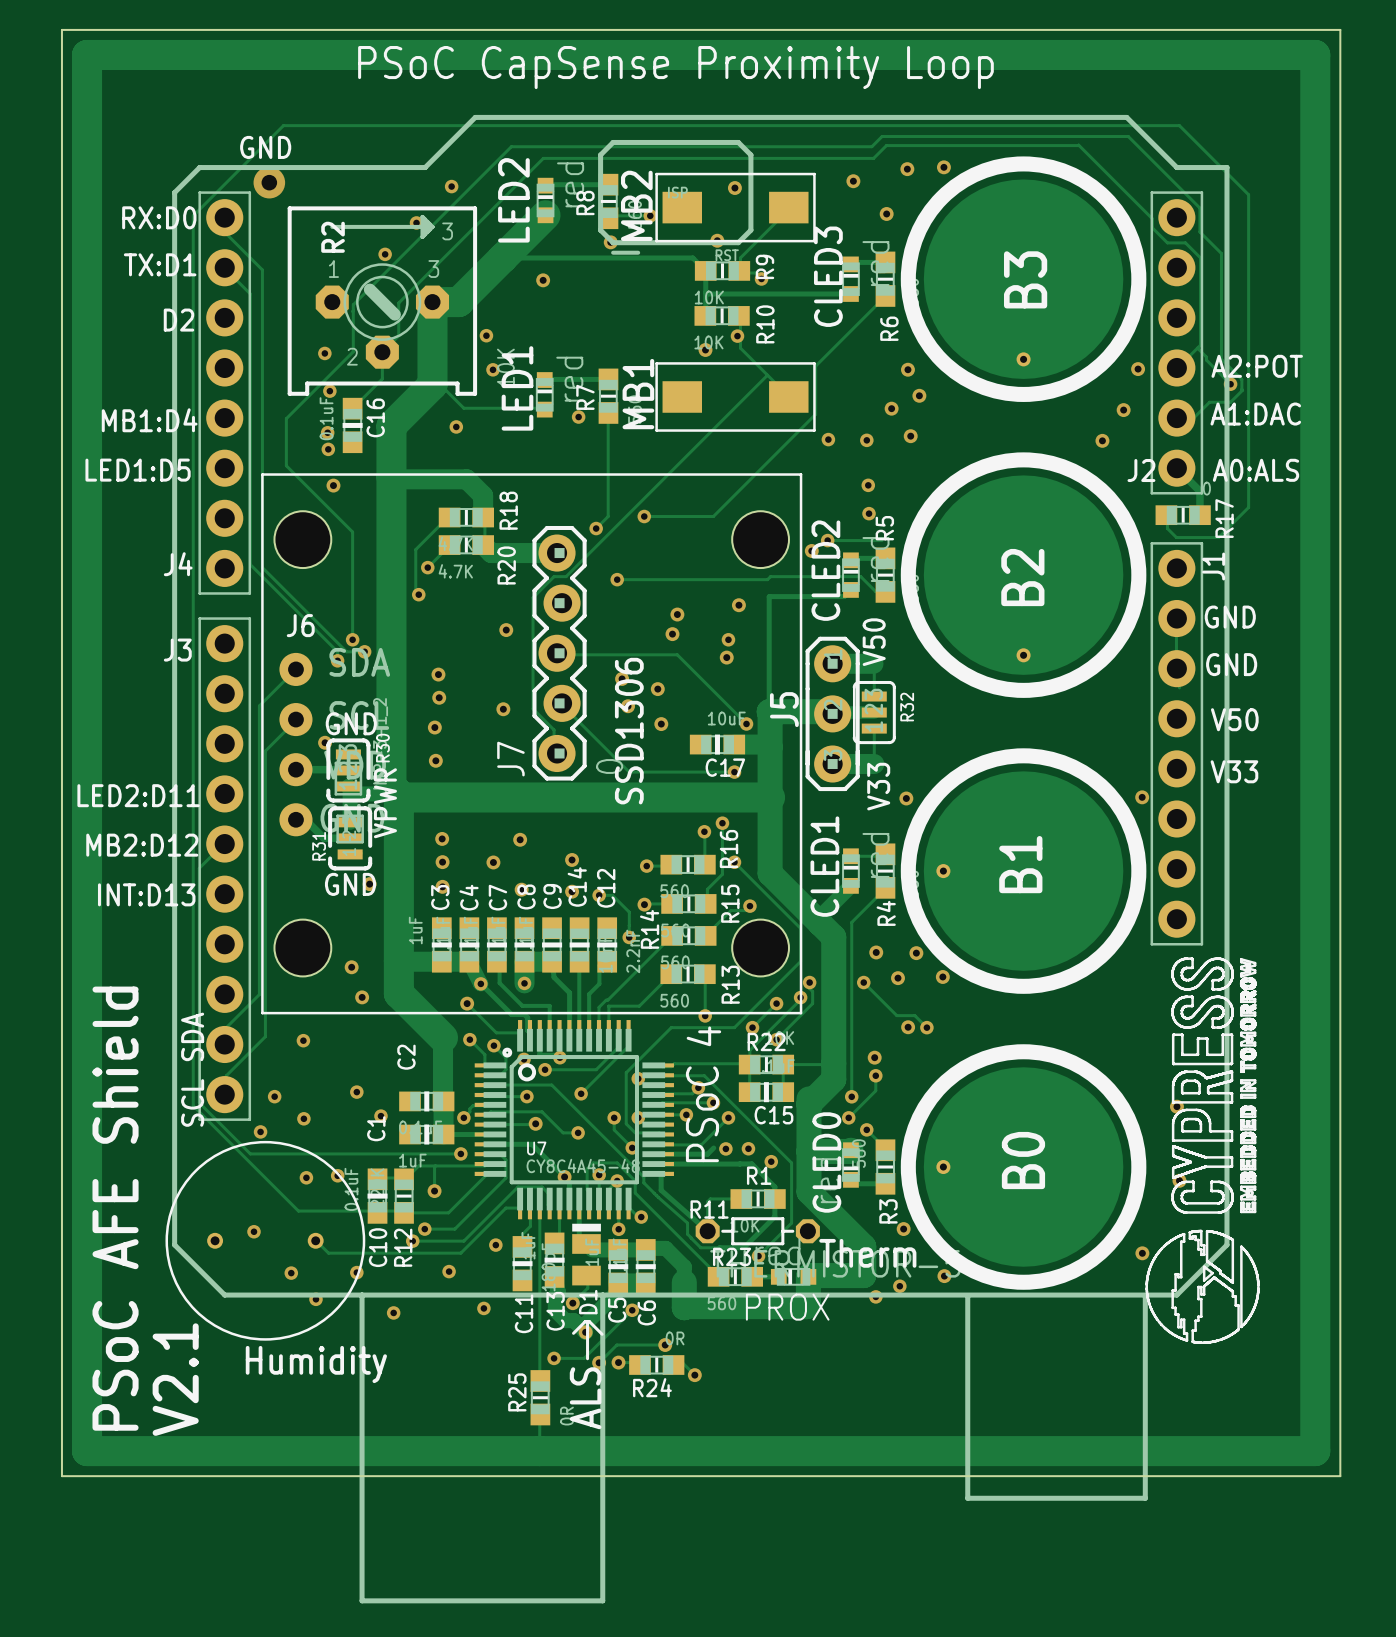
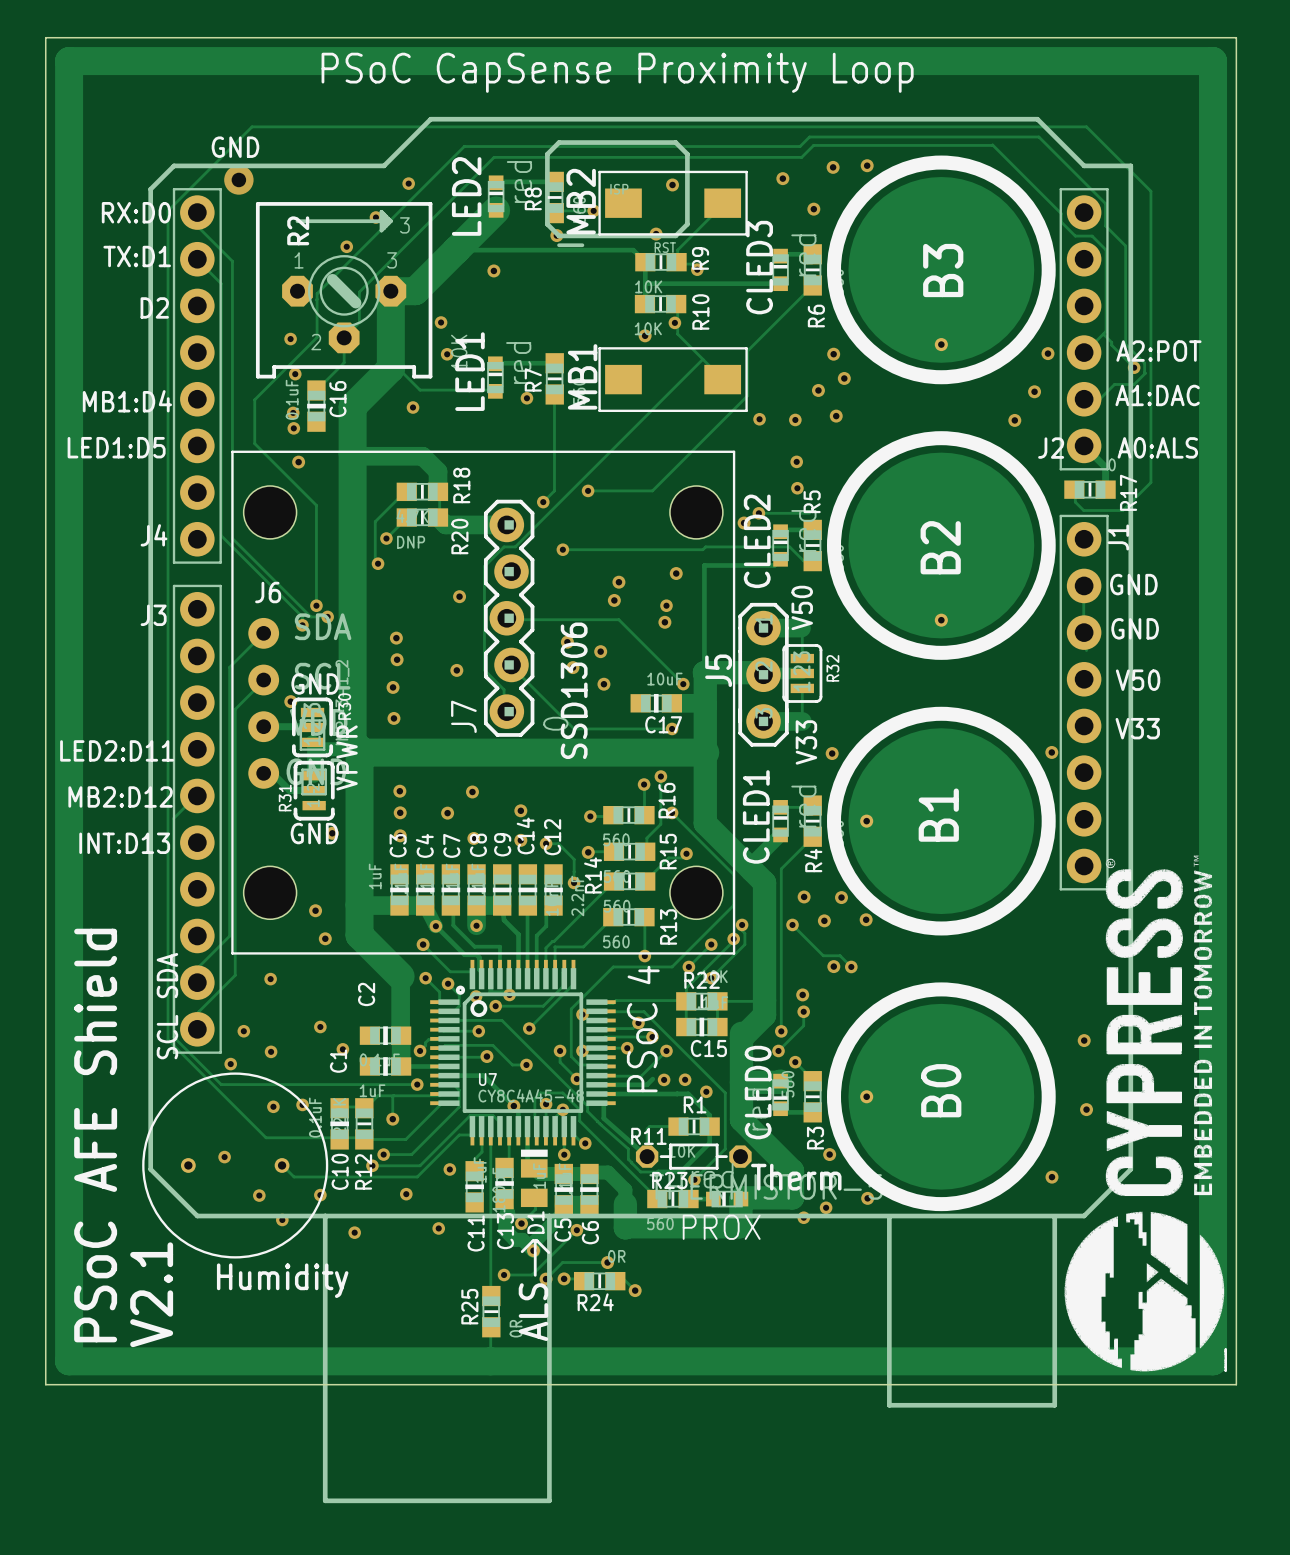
R20 value: 4.7K (455, 571) -> DNP (411, 542)
drawing: none -> [1064, 855, 1225, 1372]
drawing: [1145, 957, 1260, 1344] -> none

